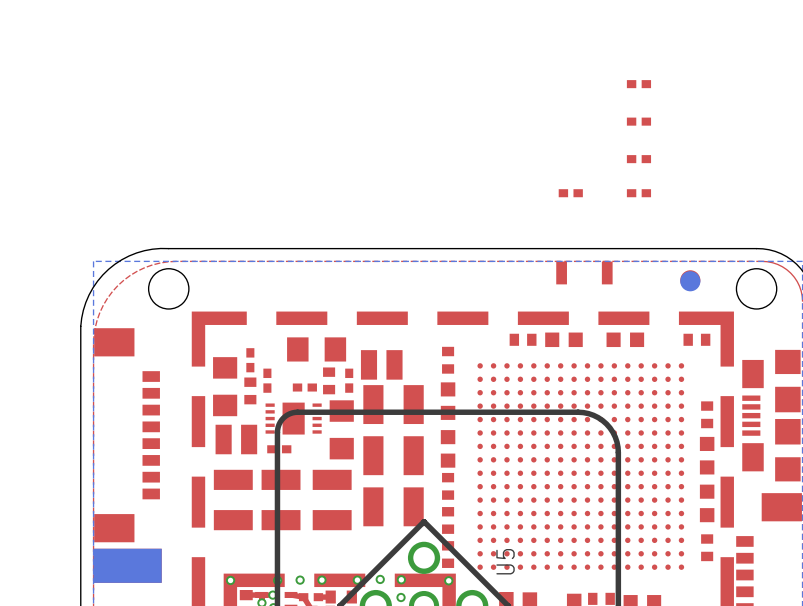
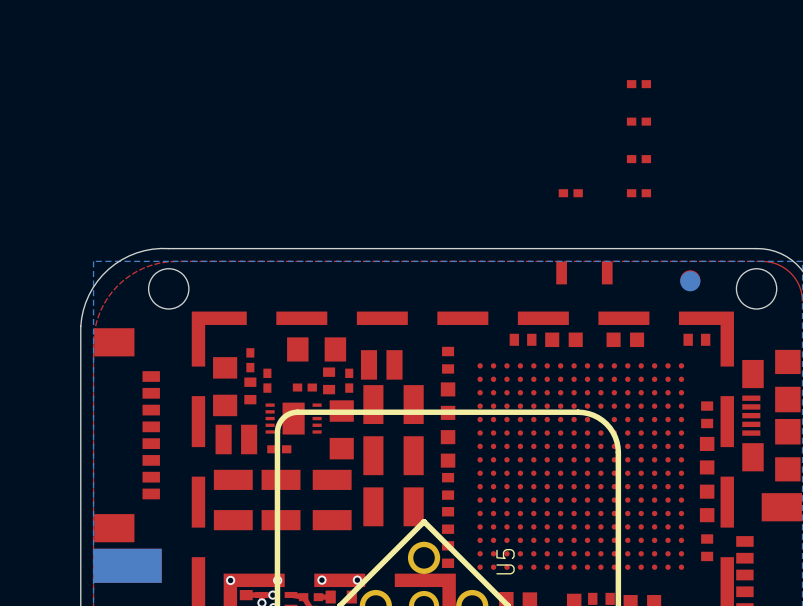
via: (380, 579) -> none
via: (401, 579) -> none
via: (300, 580) -> none
via: (448, 580) -> none
via: (401, 597) -> none

